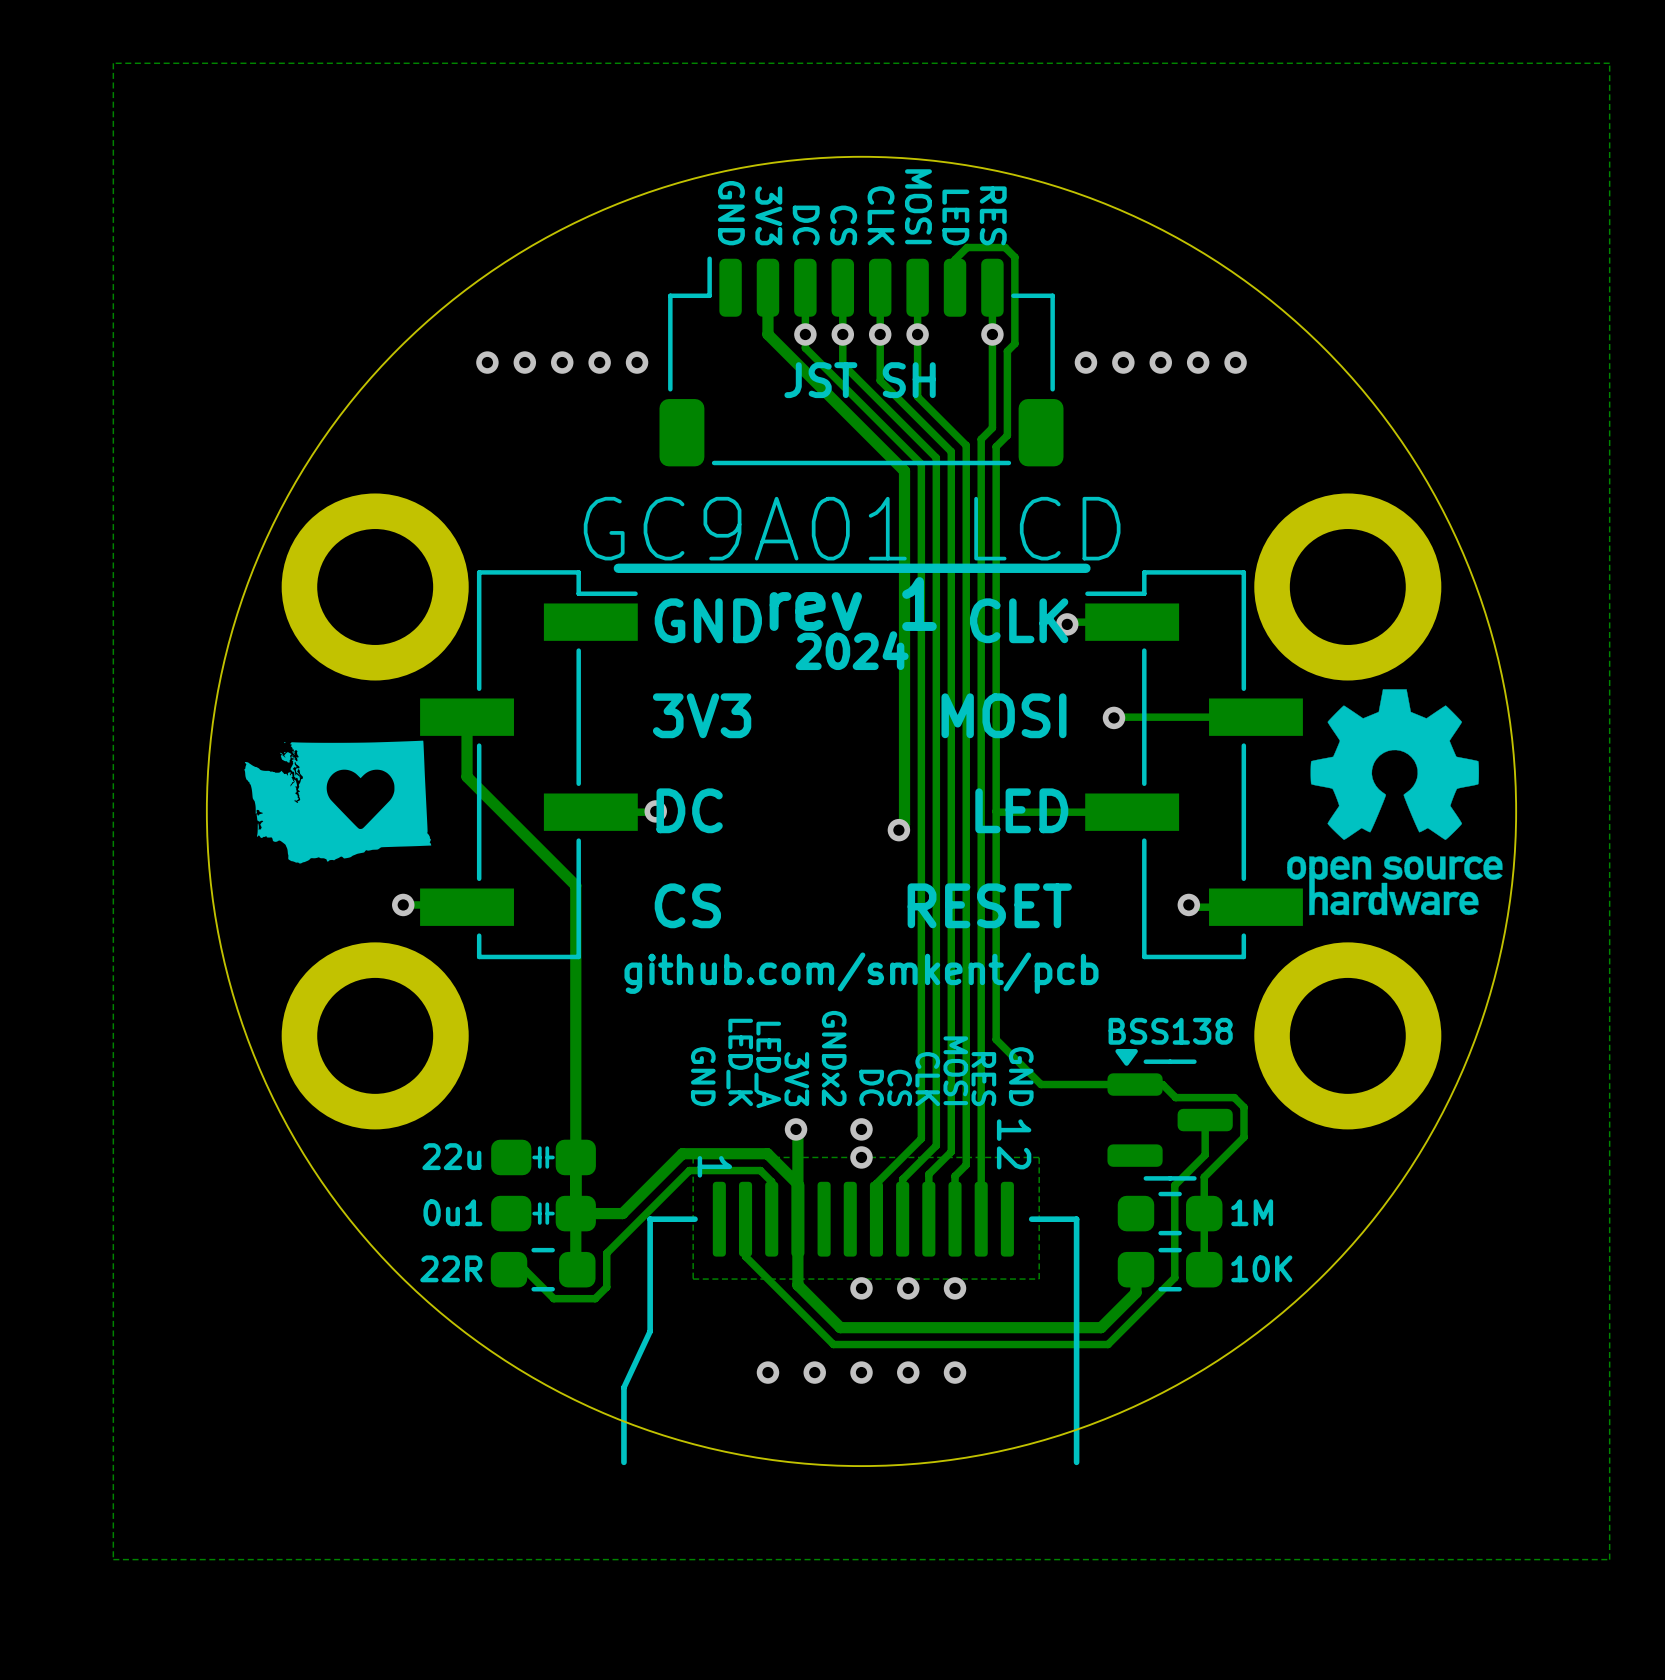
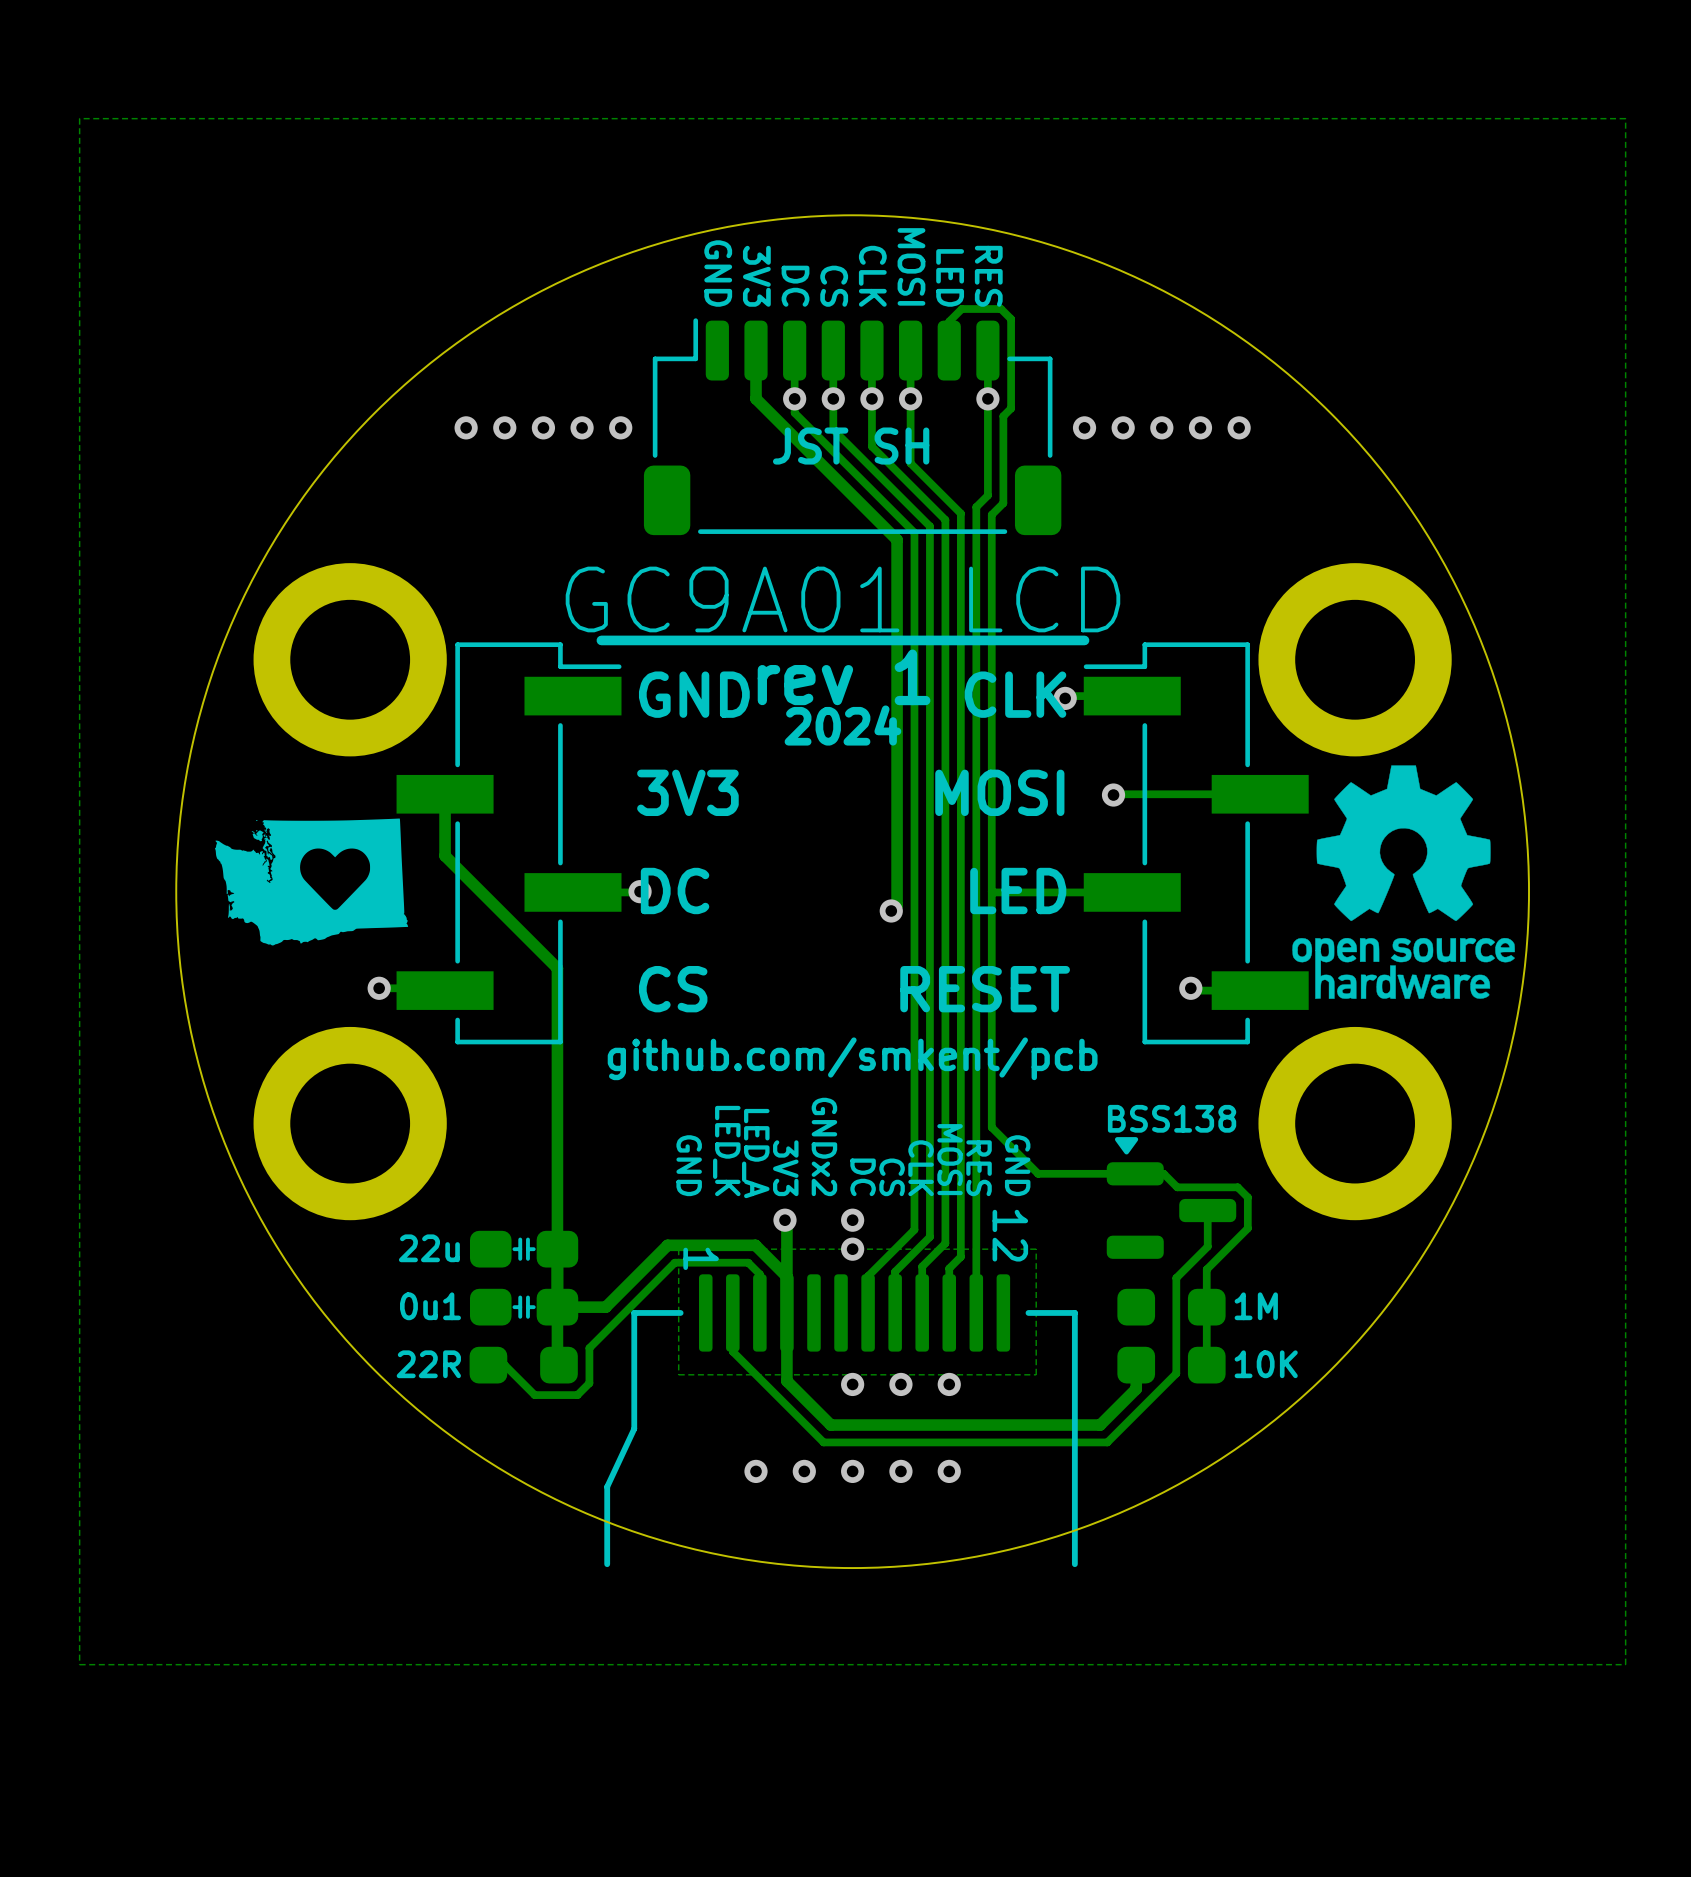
part footprint: [1107, 1048, 1233, 1181] -> [1106, 1137, 1237, 1259]
part footprint: [1117, 1191, 1223, 1236] -> [1117, 1288, 1226, 1326]
part footprint: [490, 1247, 596, 1292] -> [469, 1346, 578, 1384]
part footprint: [1117, 1247, 1223, 1292] -> [1117, 1346, 1226, 1384]

